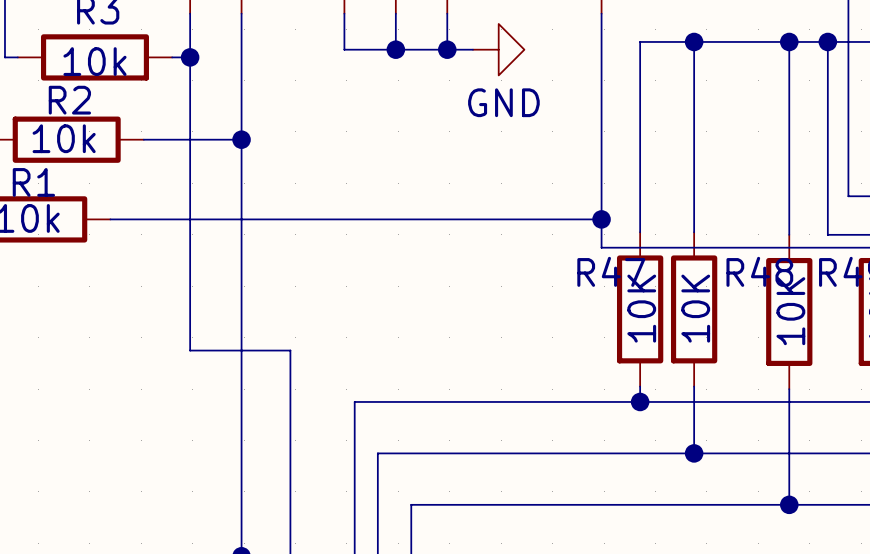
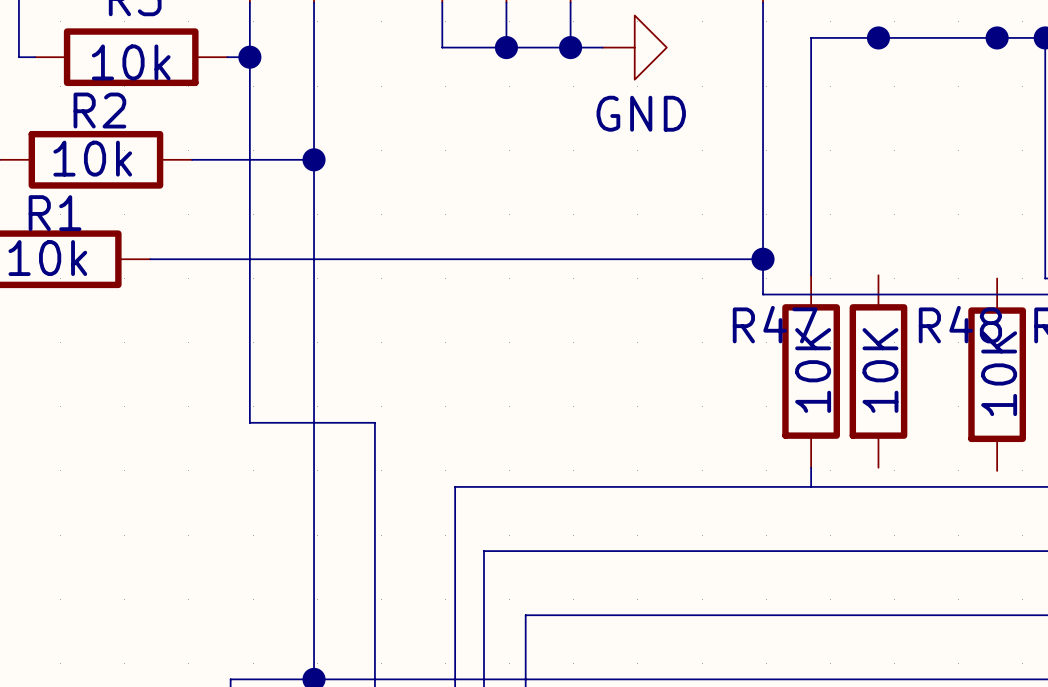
wire: (694, 41) (694, 232) -> none
wire: (789, 41) (789, 234) -> none
wire: (694, 386) (694, 453) -> none
wire: (789, 389) (789, 504) -> none
junction: (640, 401) -> none
junction: (694, 453) -> none
junction: (789, 504) -> none

